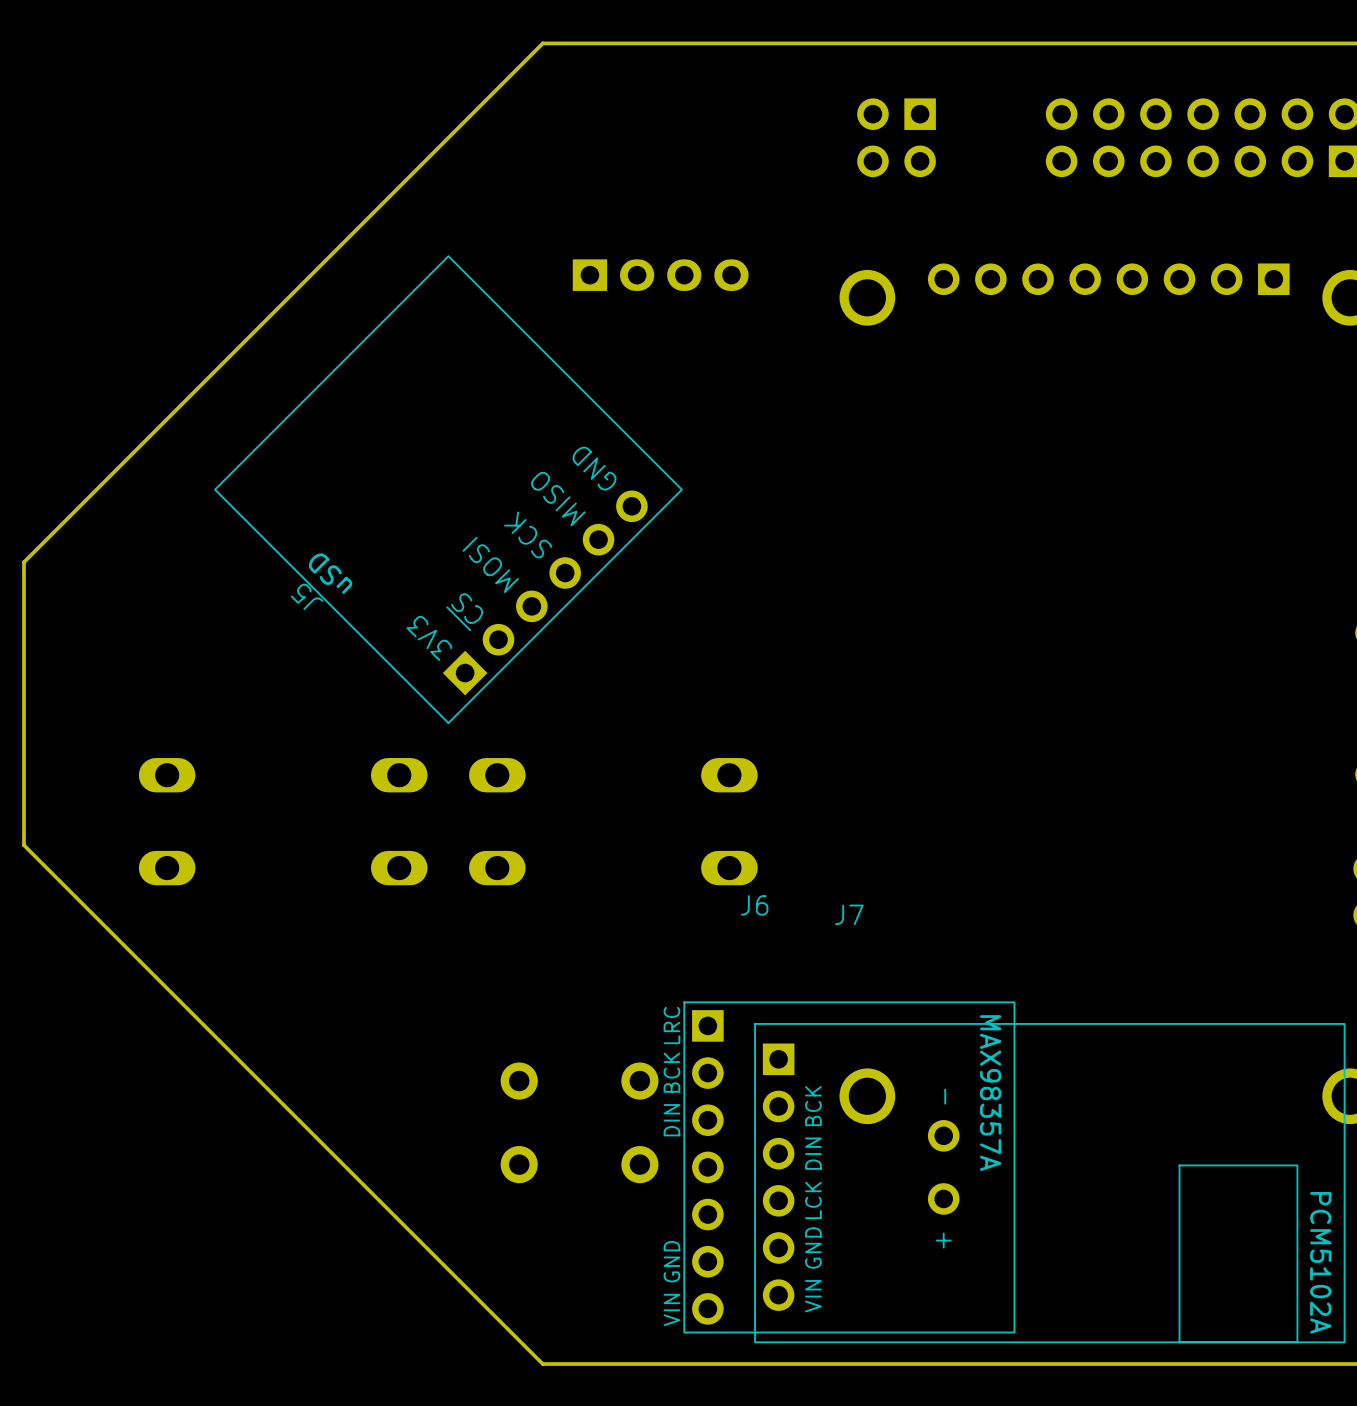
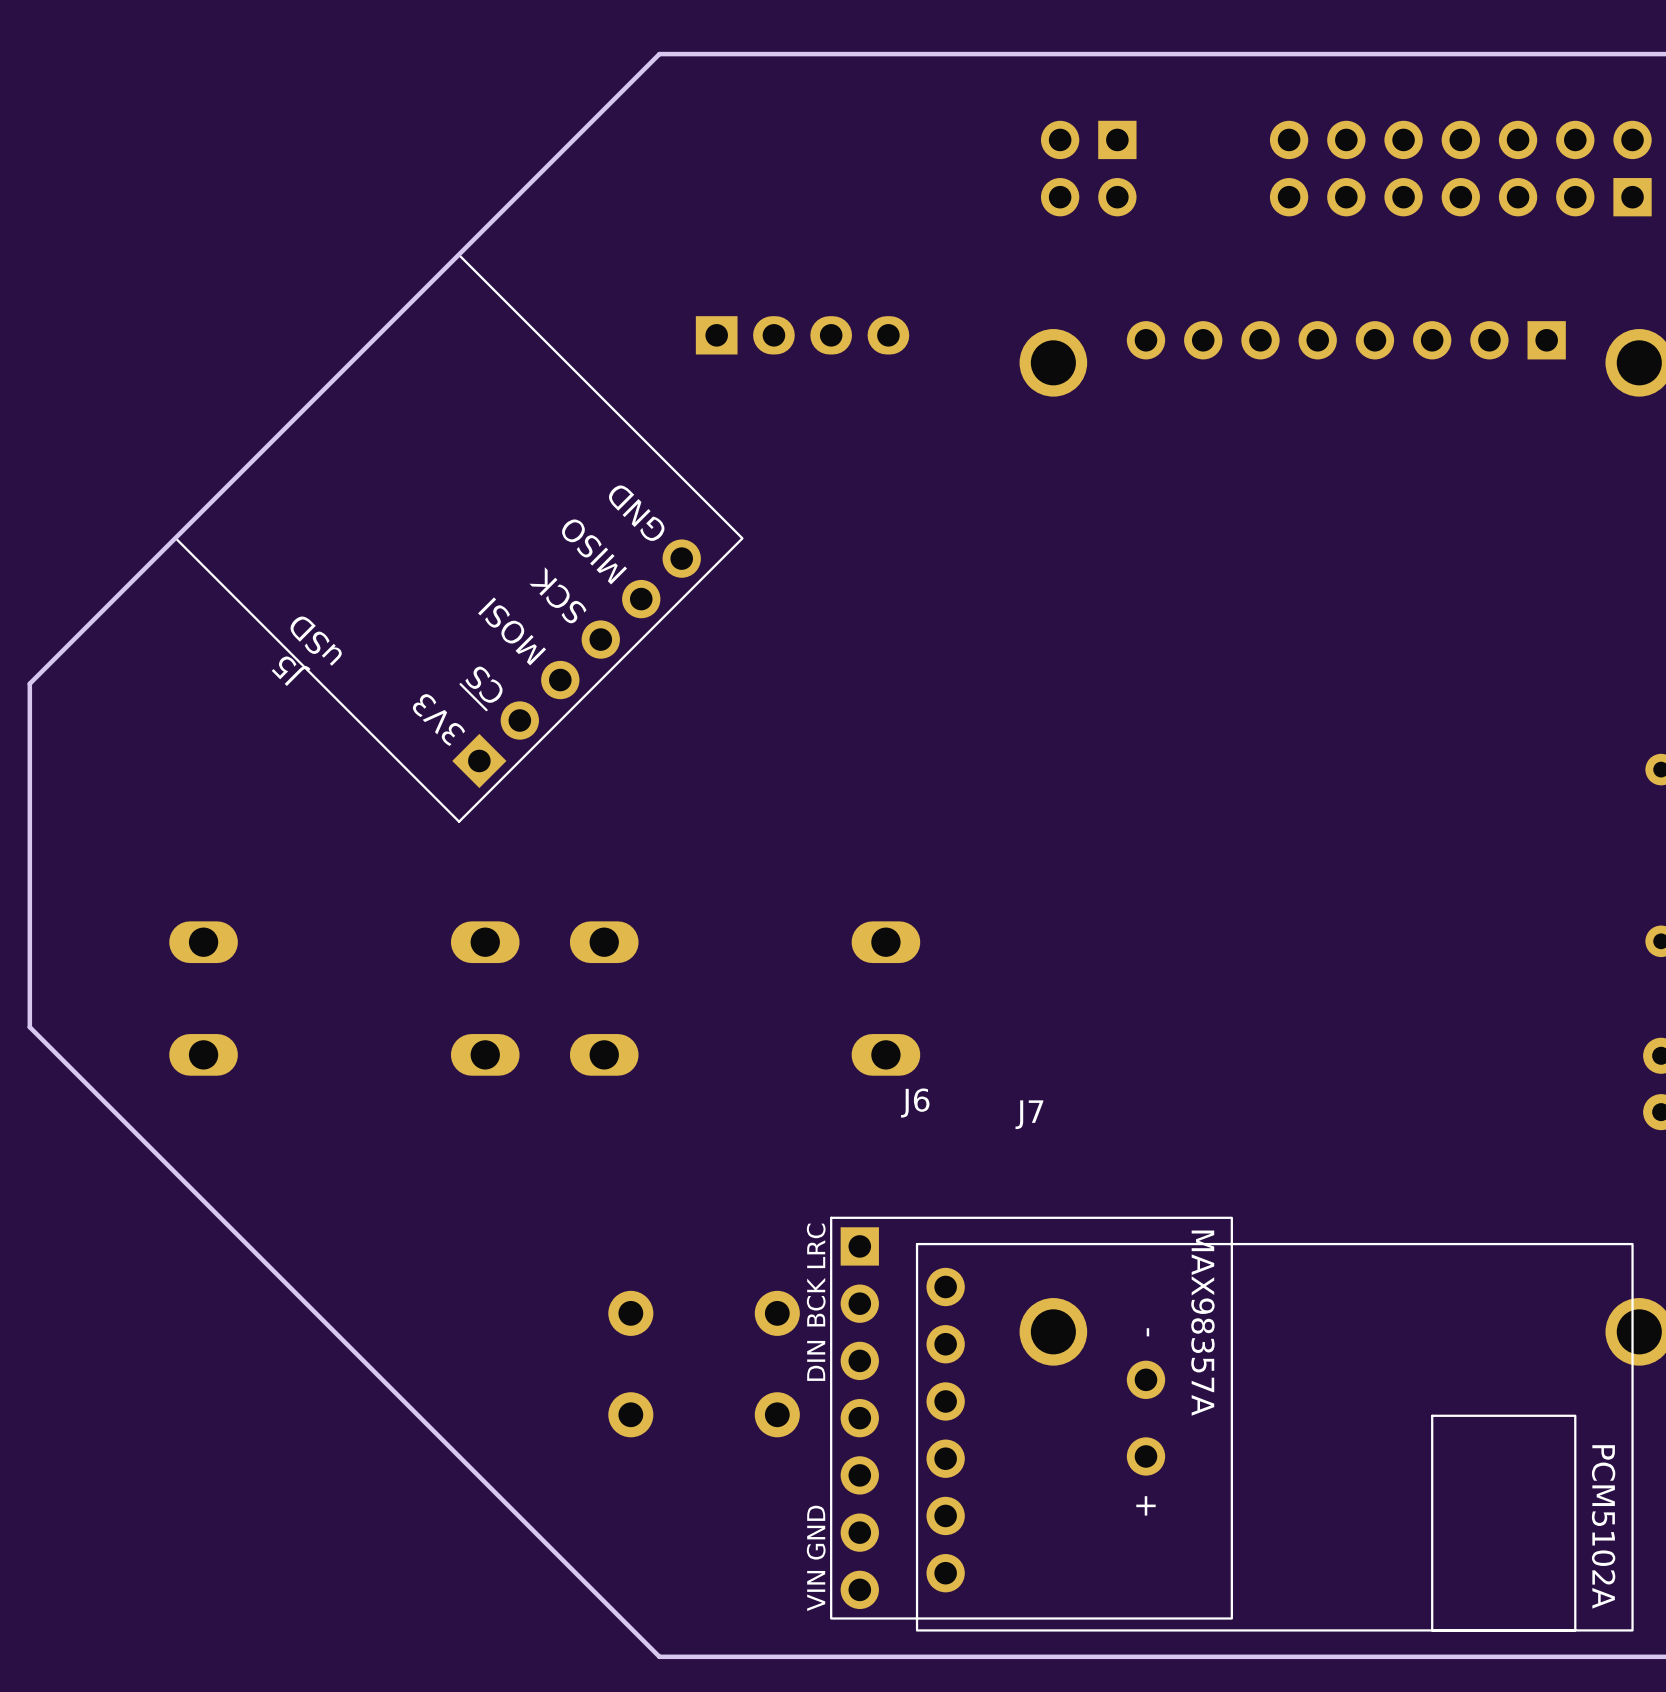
J5 position: (448, 489) -> (459, 538)
J6 footprint: [754, 1023, 1346, 1344] -> [915, 1242, 1634, 1632]

